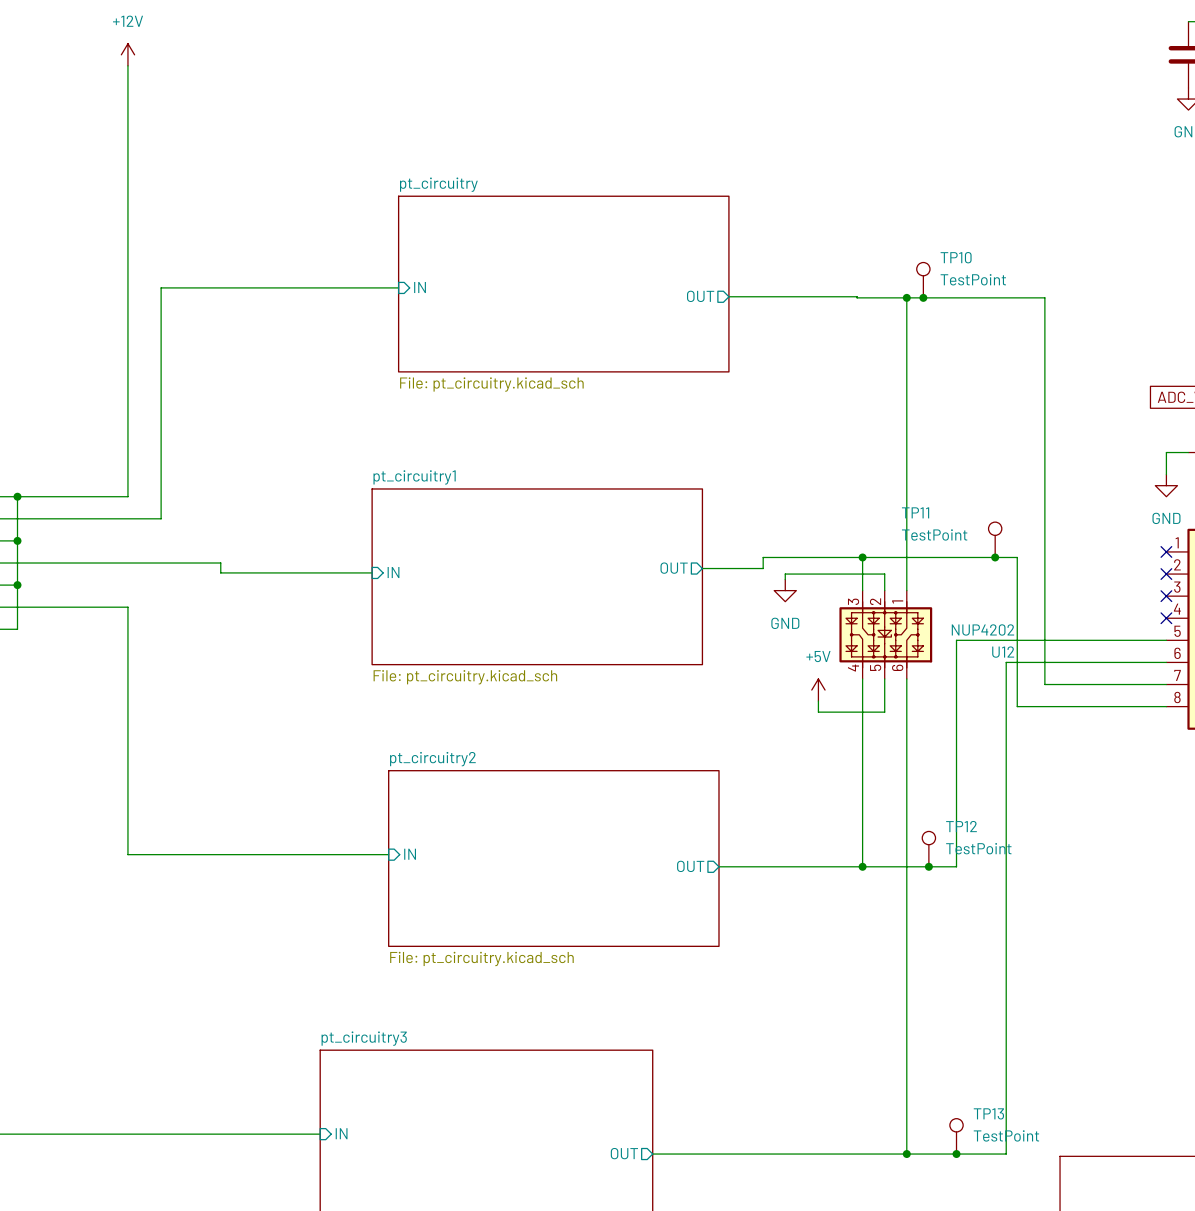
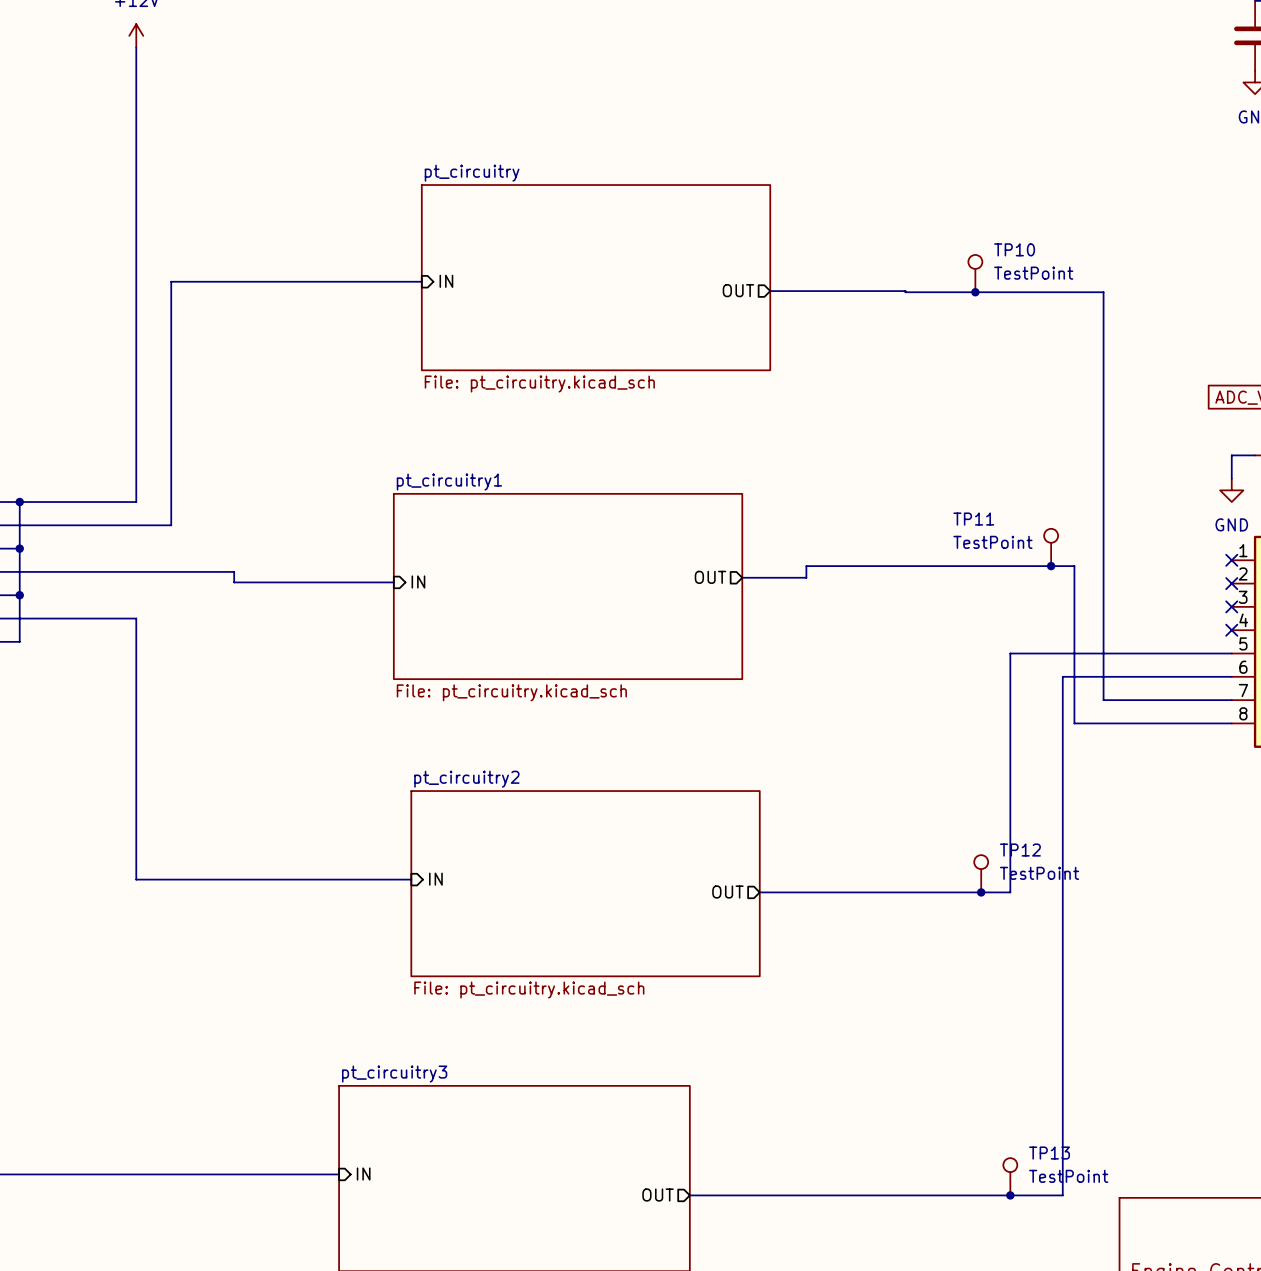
wire: (906, 297) (906, 590) -> none
junction: (906, 297) -> none
wire: (862, 557) (862, 590) -> none
junction: (862, 557) -> none
wire: (785, 579) (785, 574) (884, 574) (884, 590) -> none
power symbol: GND (785, 590) -> none
U12: NUP4202 (885, 634) -> none
wire: (862, 678) (862, 866) -> none
wire: (884, 678) (884, 712) (818, 712) (818, 701) -> none
wire: (906, 678) (906, 1154) -> none
power symbol: +5V (818, 690) -> none
junction: (862, 866) -> none
junction: (906, 1154) -> none

